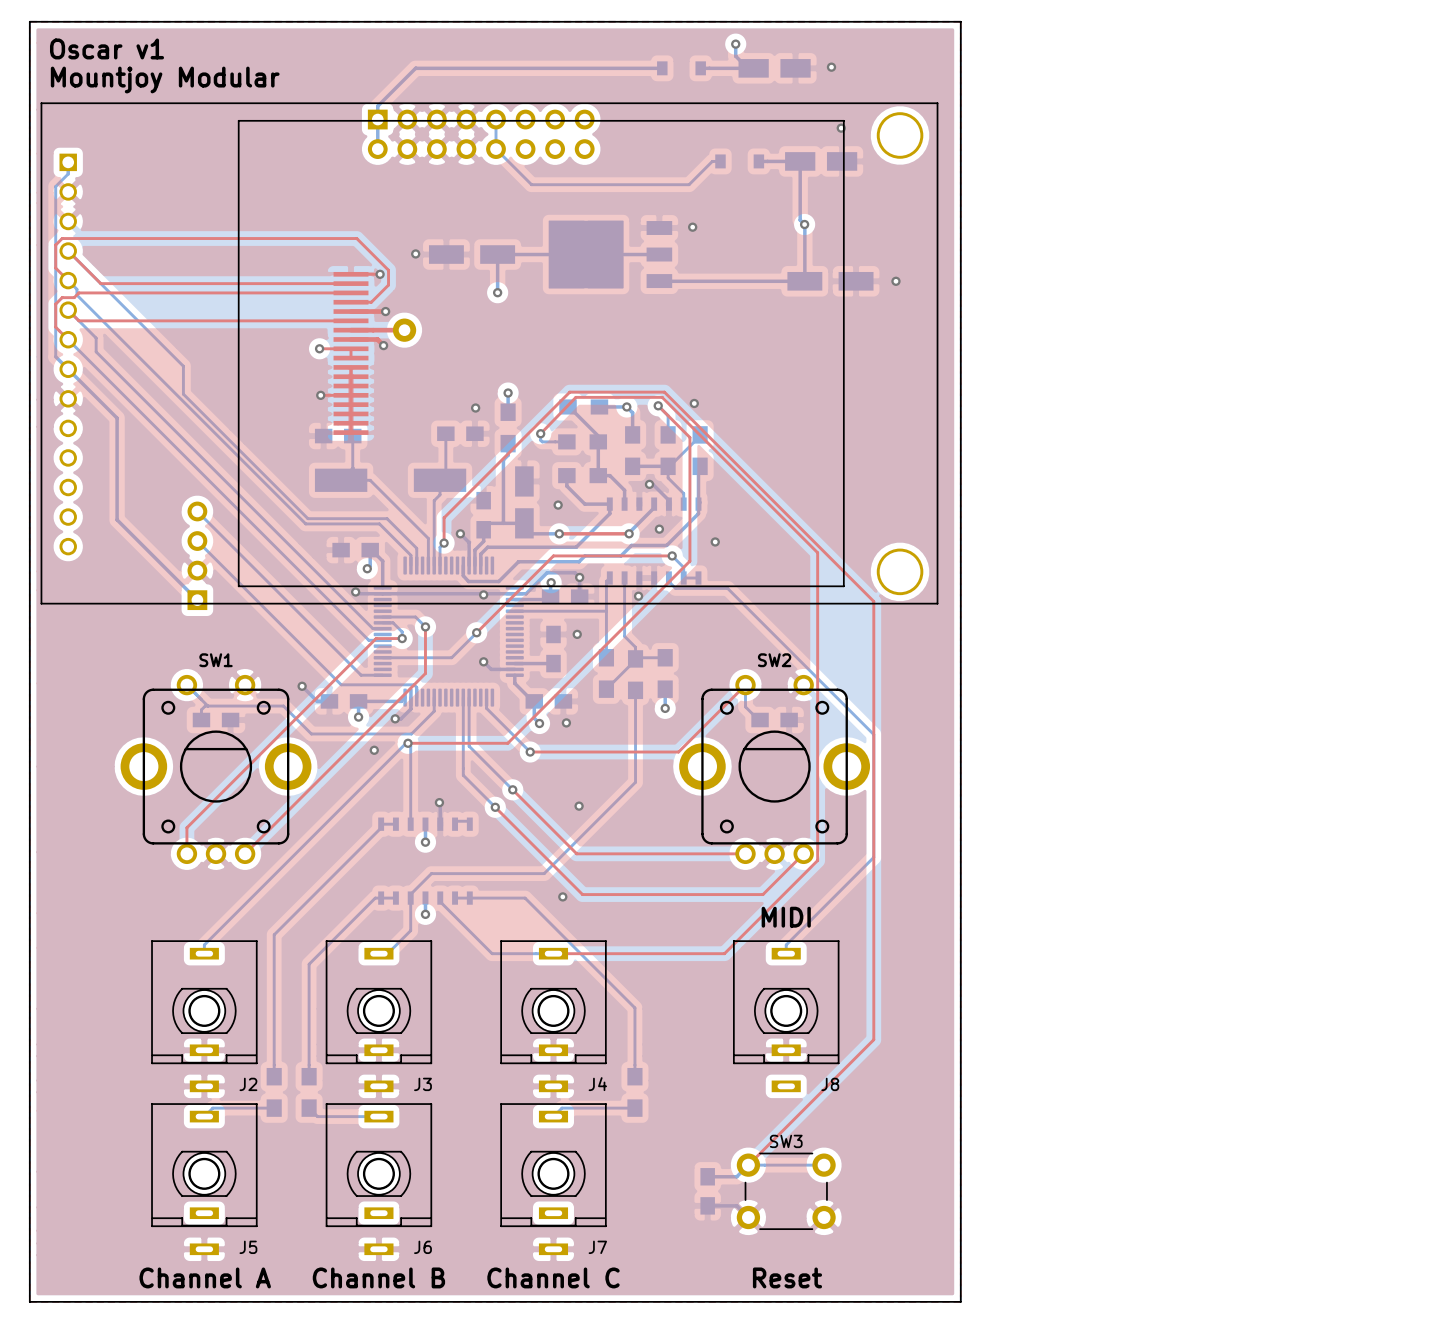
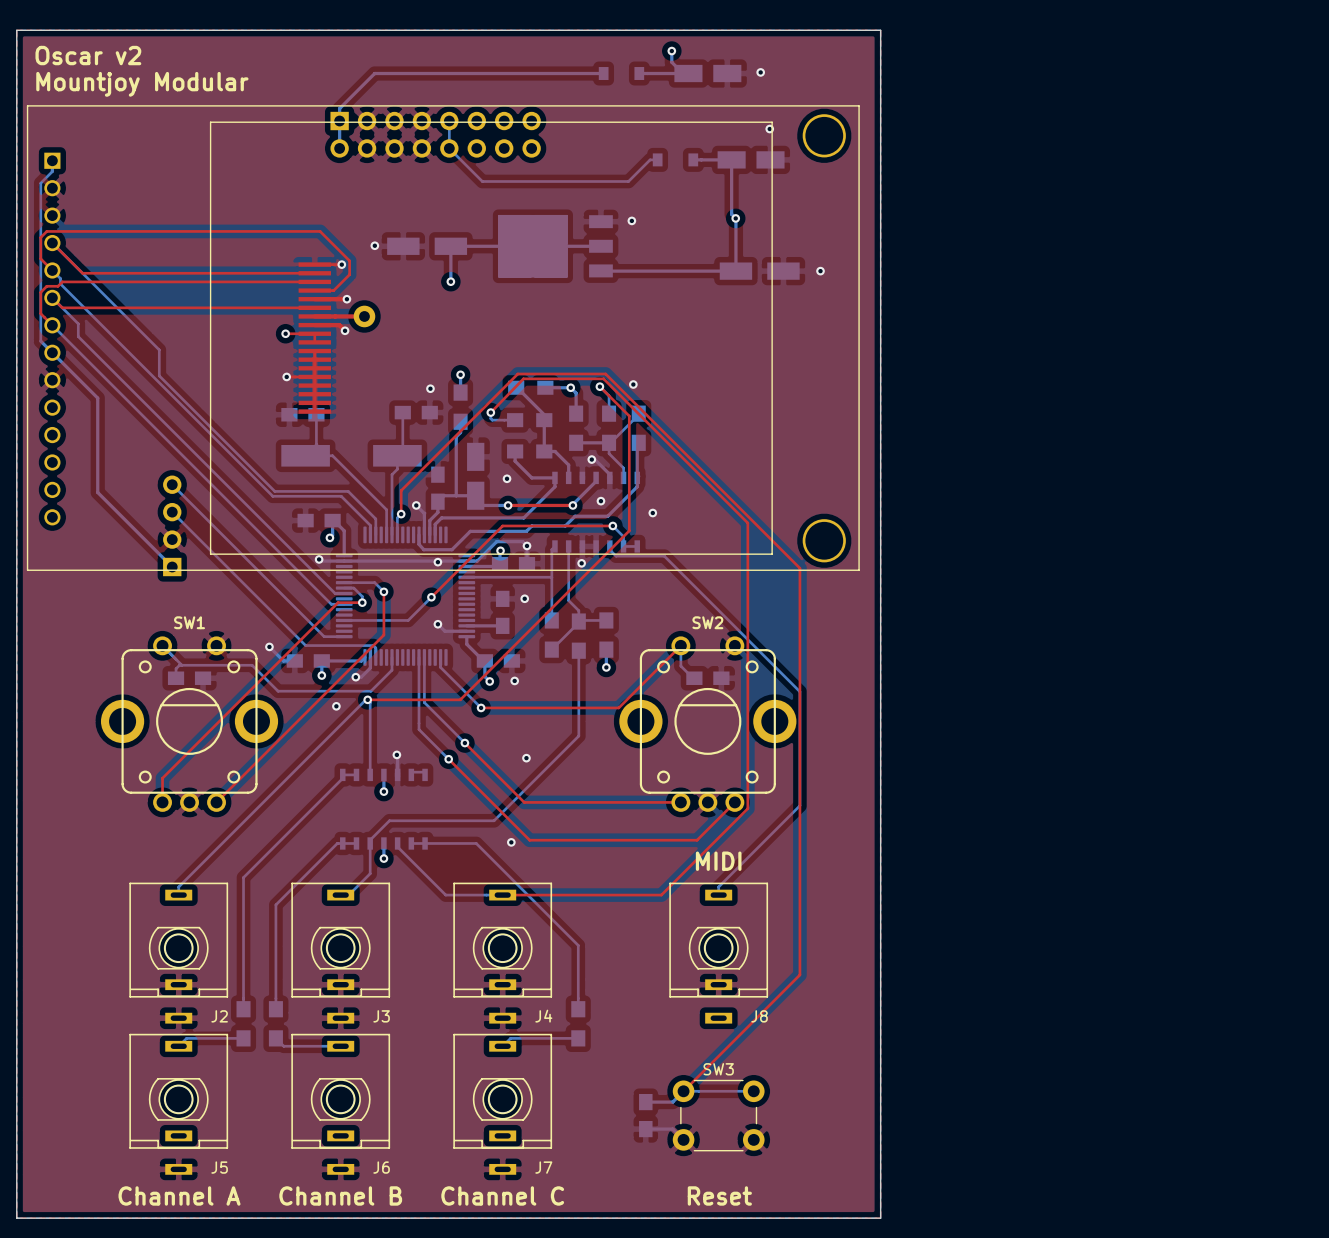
text: Oscar v1 (107, 48) -> Oscar v2 (88, 55)

